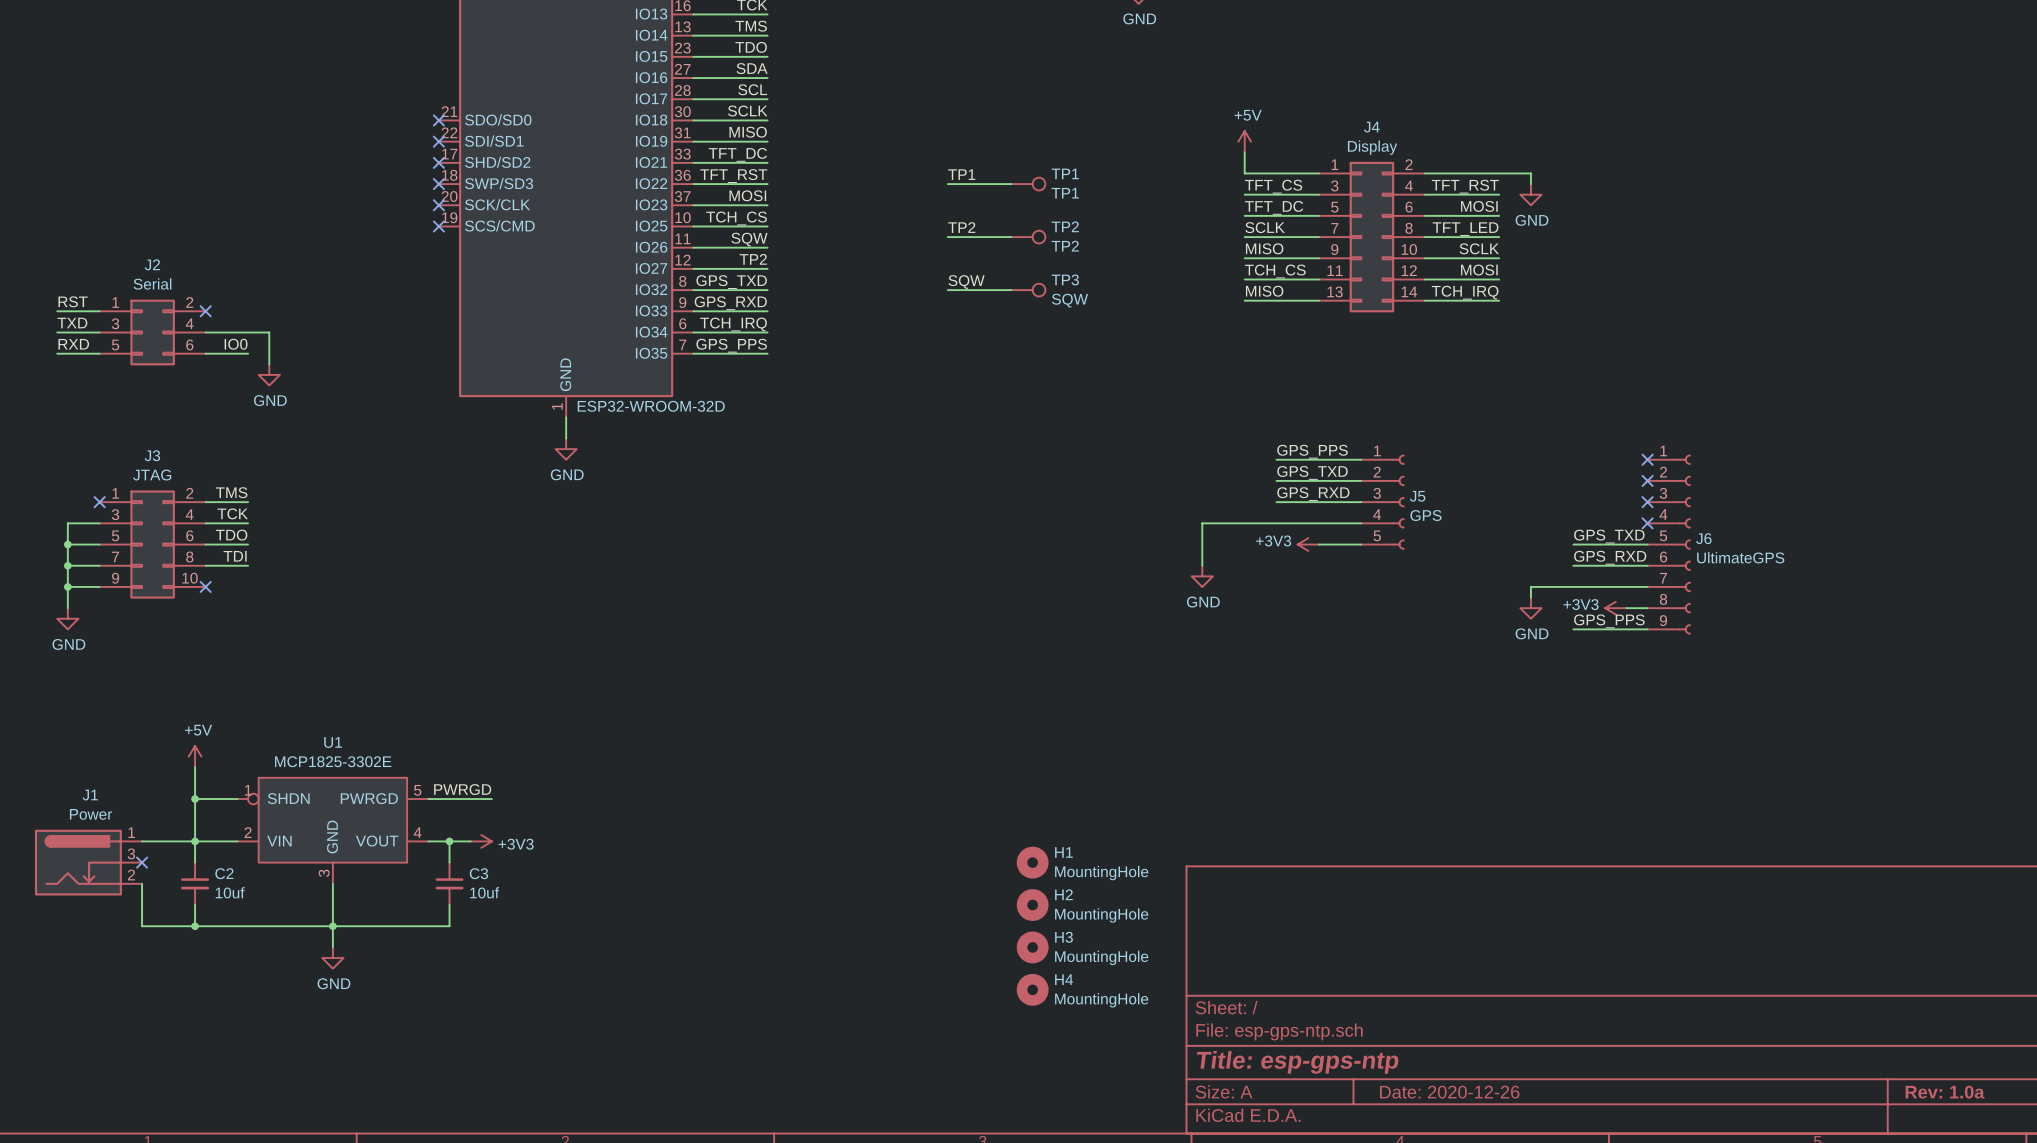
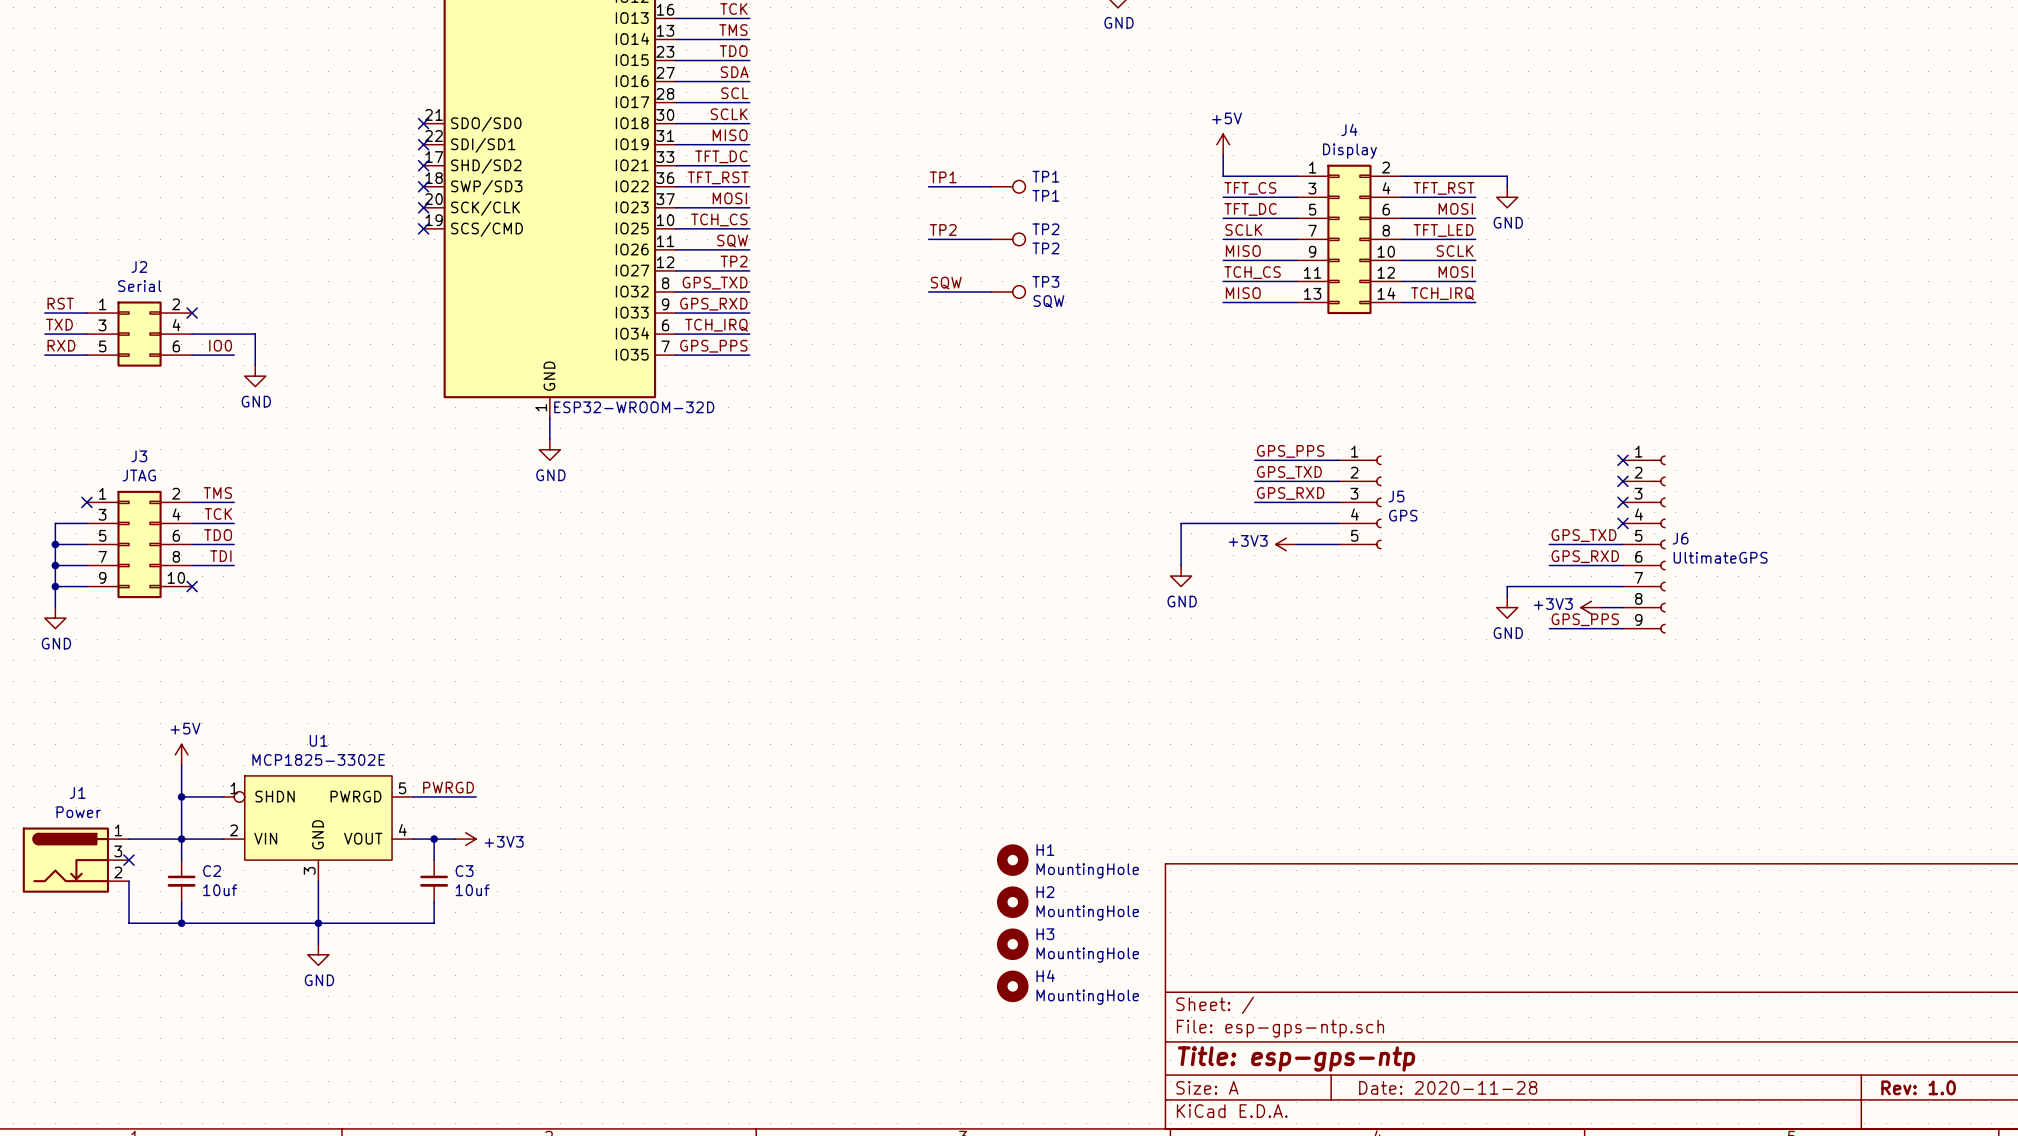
title block: Date: 2020-12-26 (1449, 1092) -> Date: 2020-11-28 (1448, 1087)
title block: Rev: 1.0a (1945, 1092) -> Rev: 1.0 (1918, 1087)

